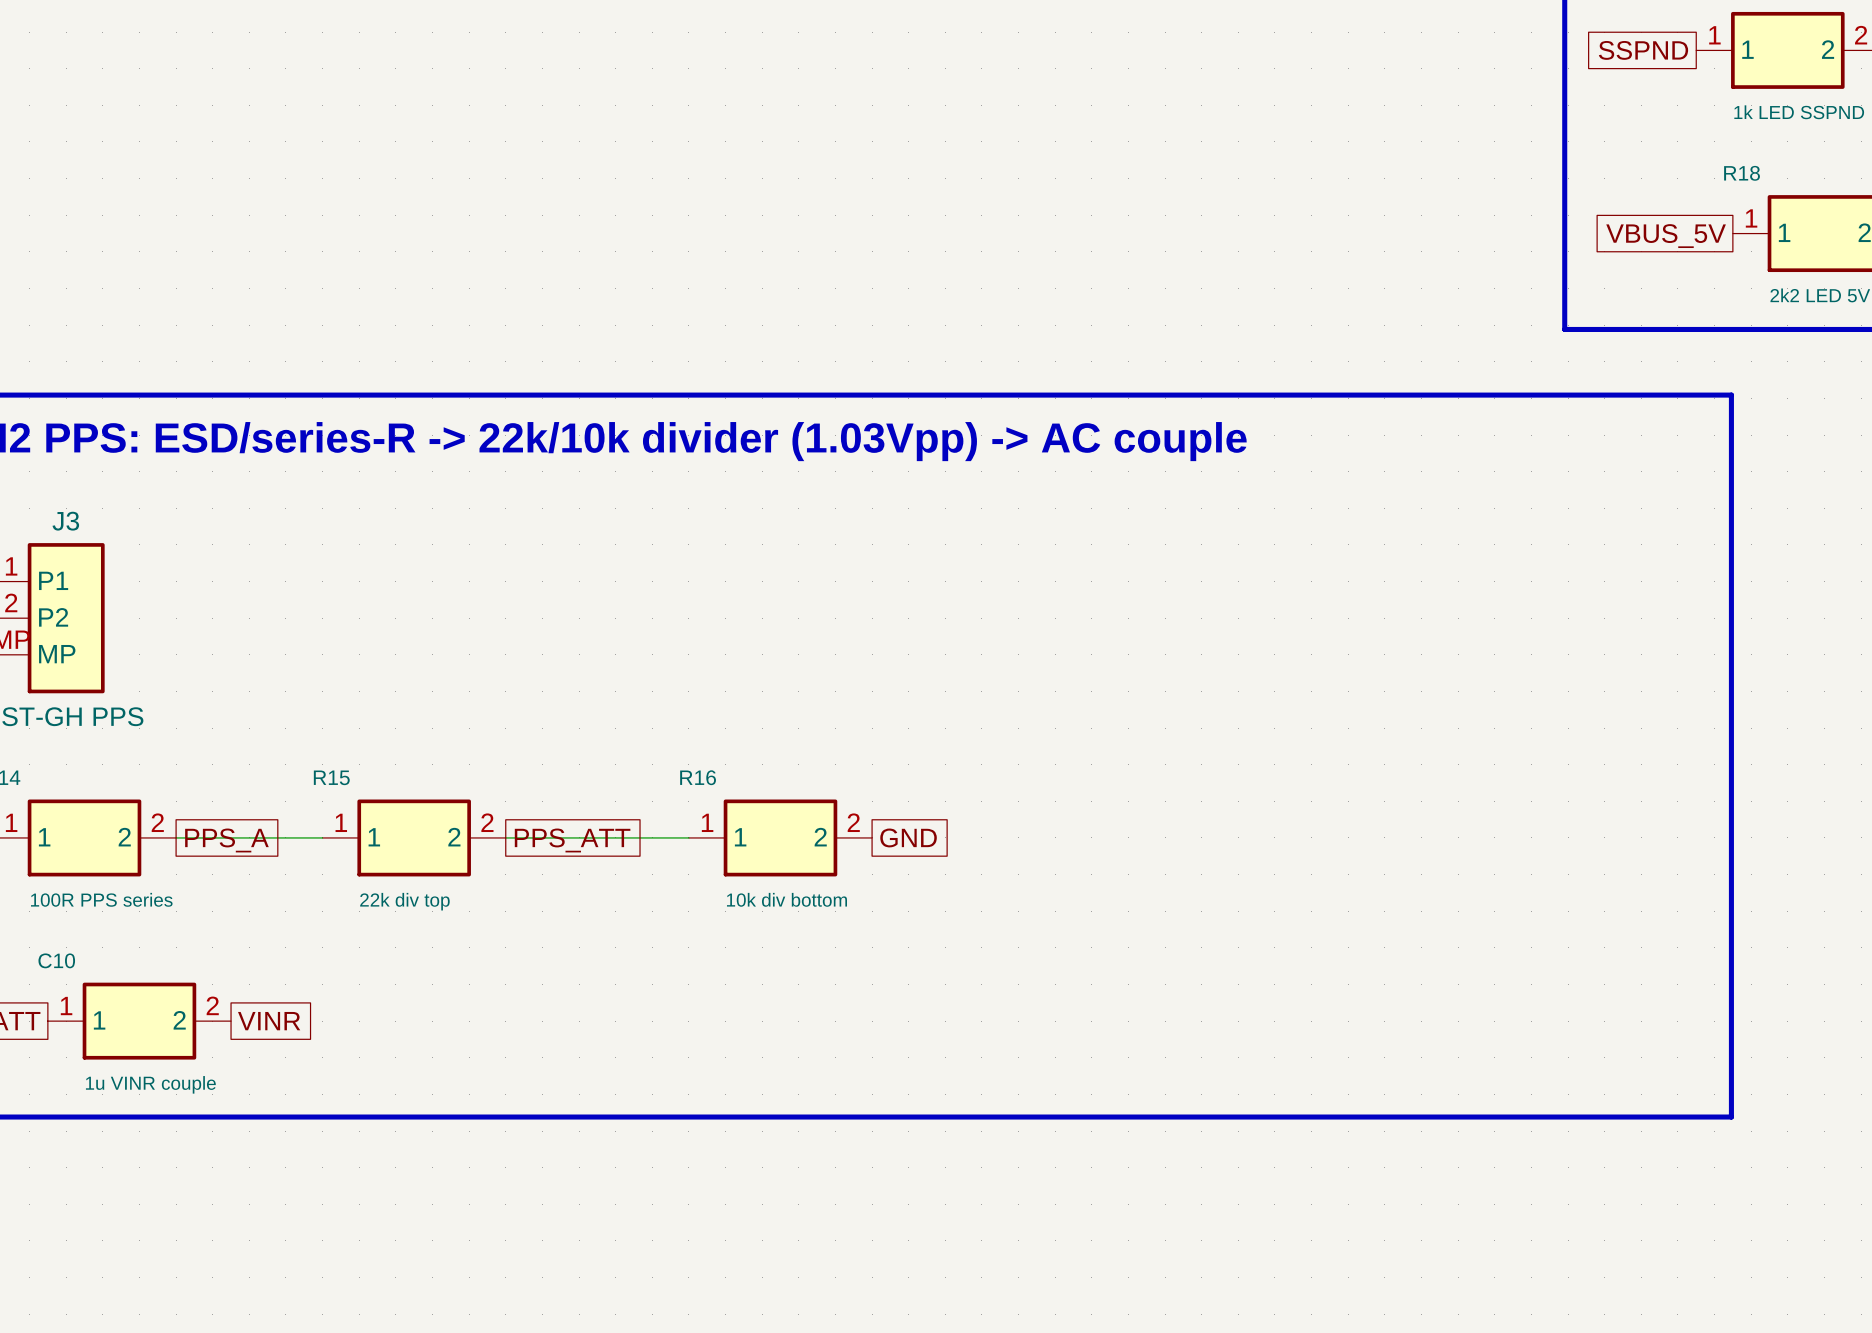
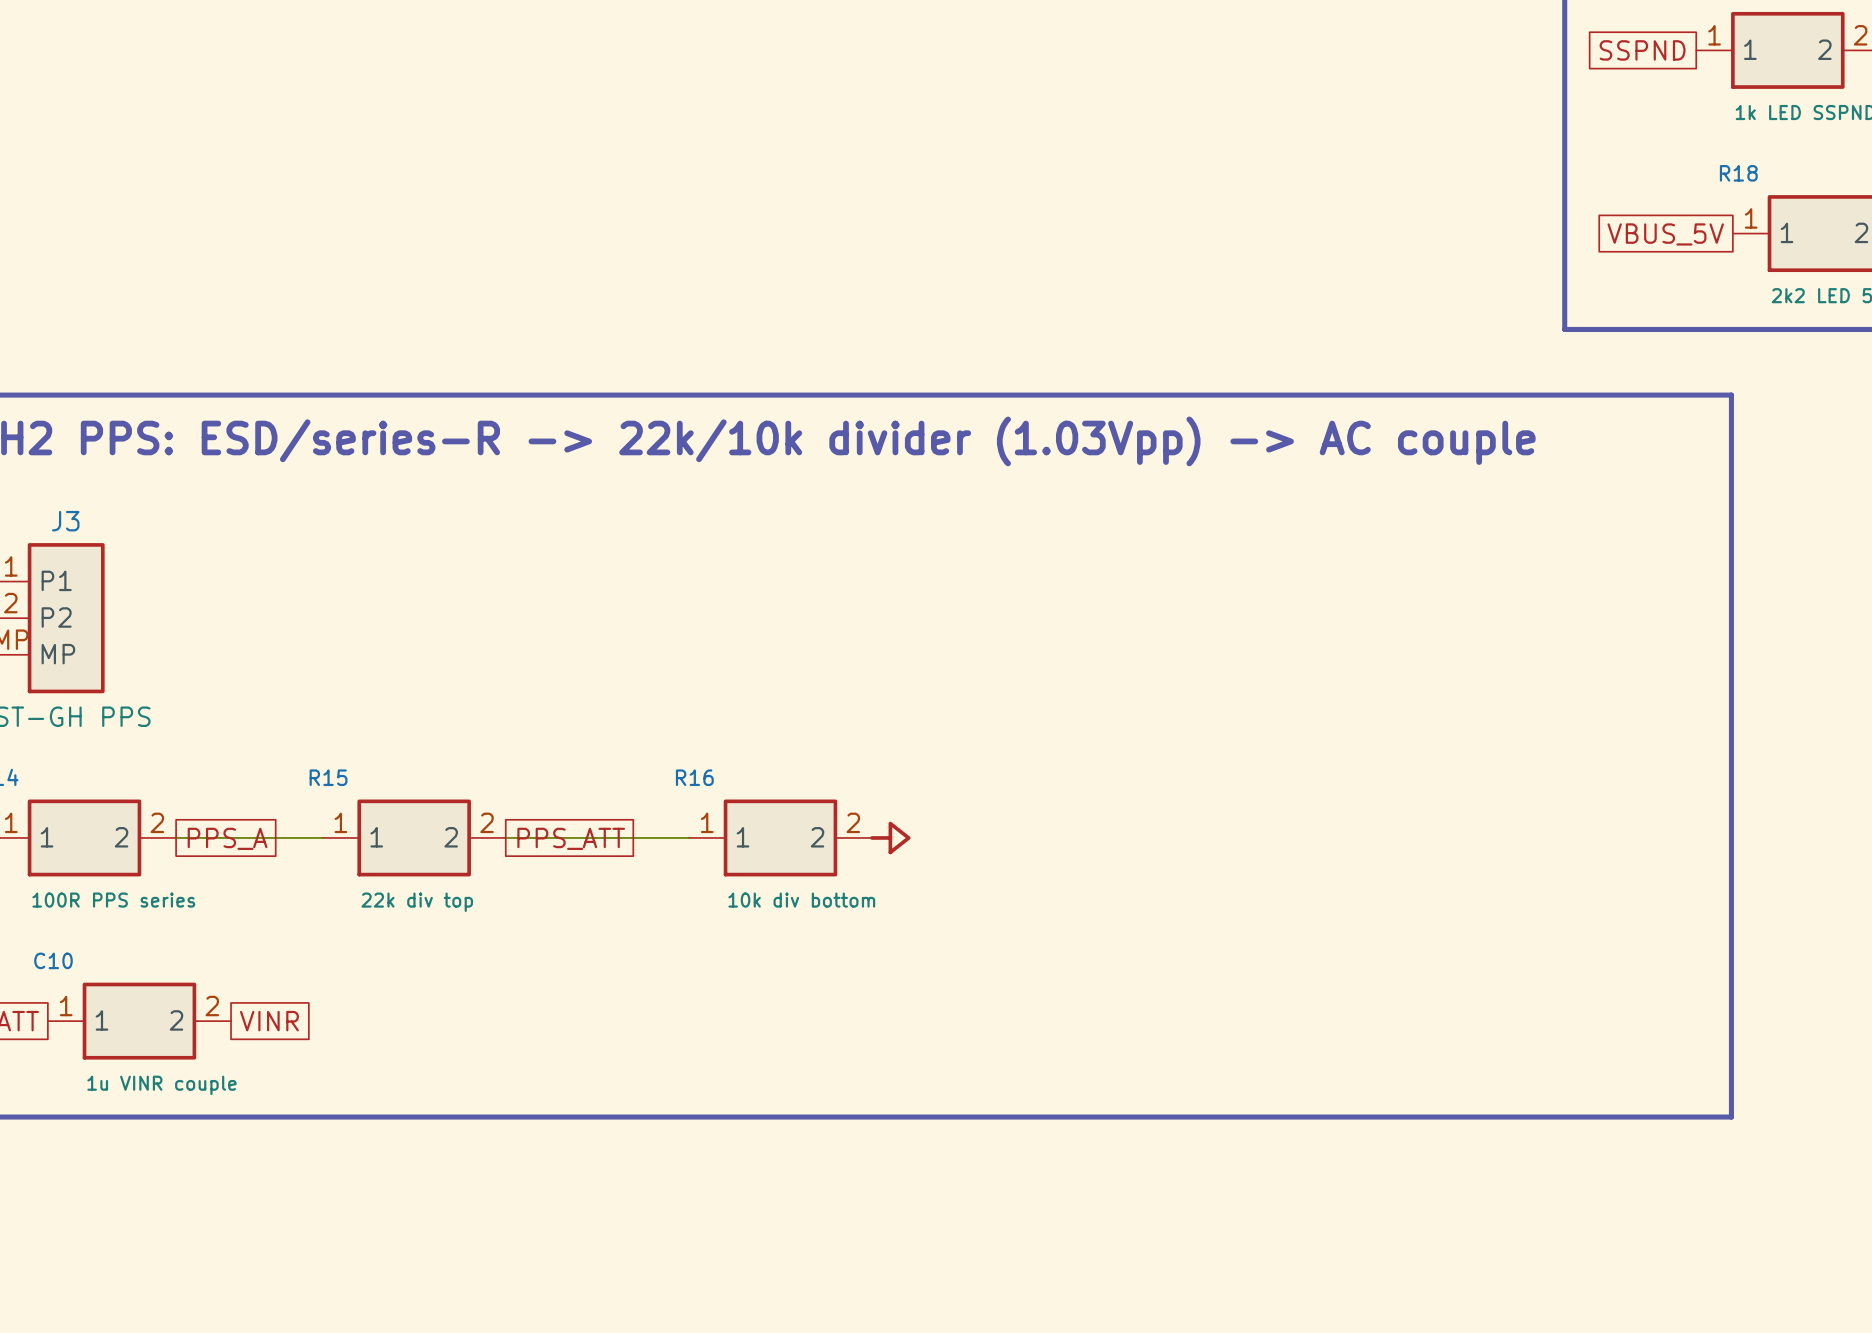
power symbol: none -> (890, 837)
global label: GND (908, 837) -> none

